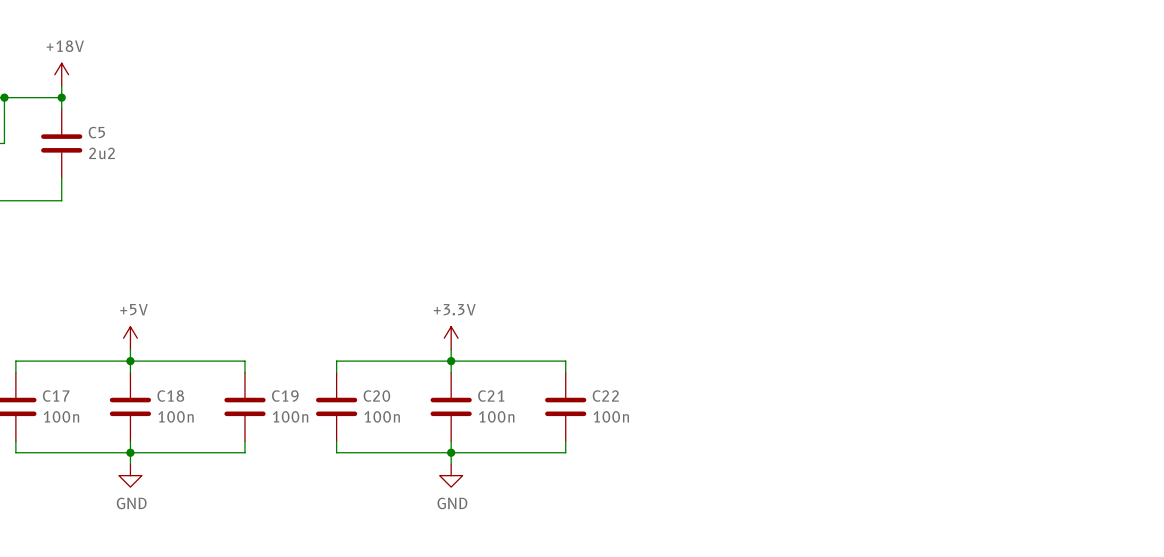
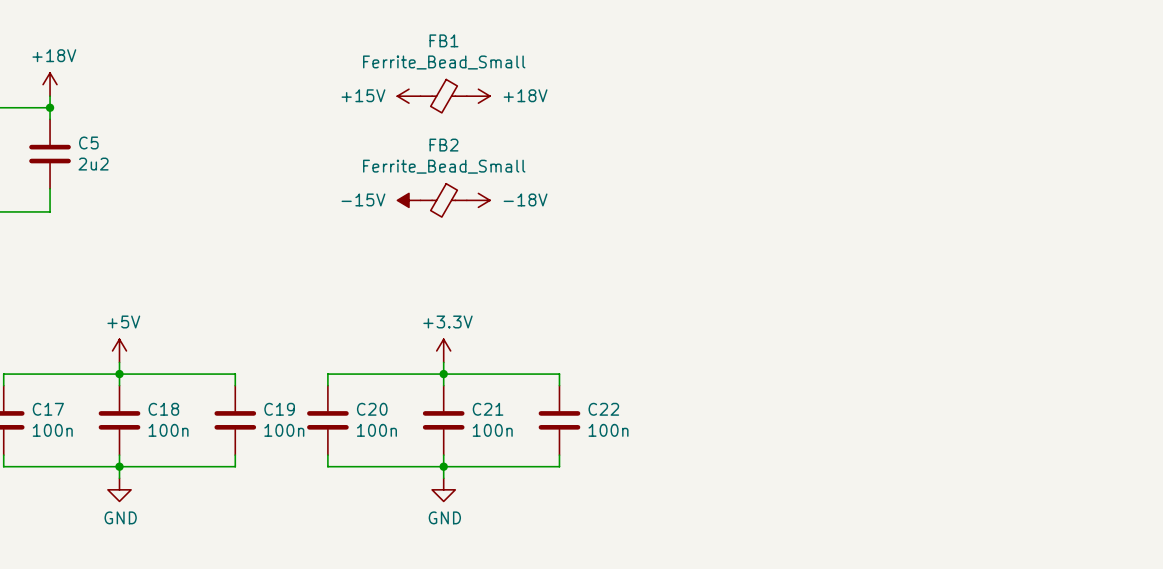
power symbol: none -> +15V (408, 96)
FB1: none -> Ferrite_Bead_Small (443, 96)
power symbol: none -> +18V (478, 96)
power symbol: none -> -15V (408, 200)
FB2: none -> Ferrite_Bead_Small (443, 200)
power symbol: none -> -18V (478, 200)

